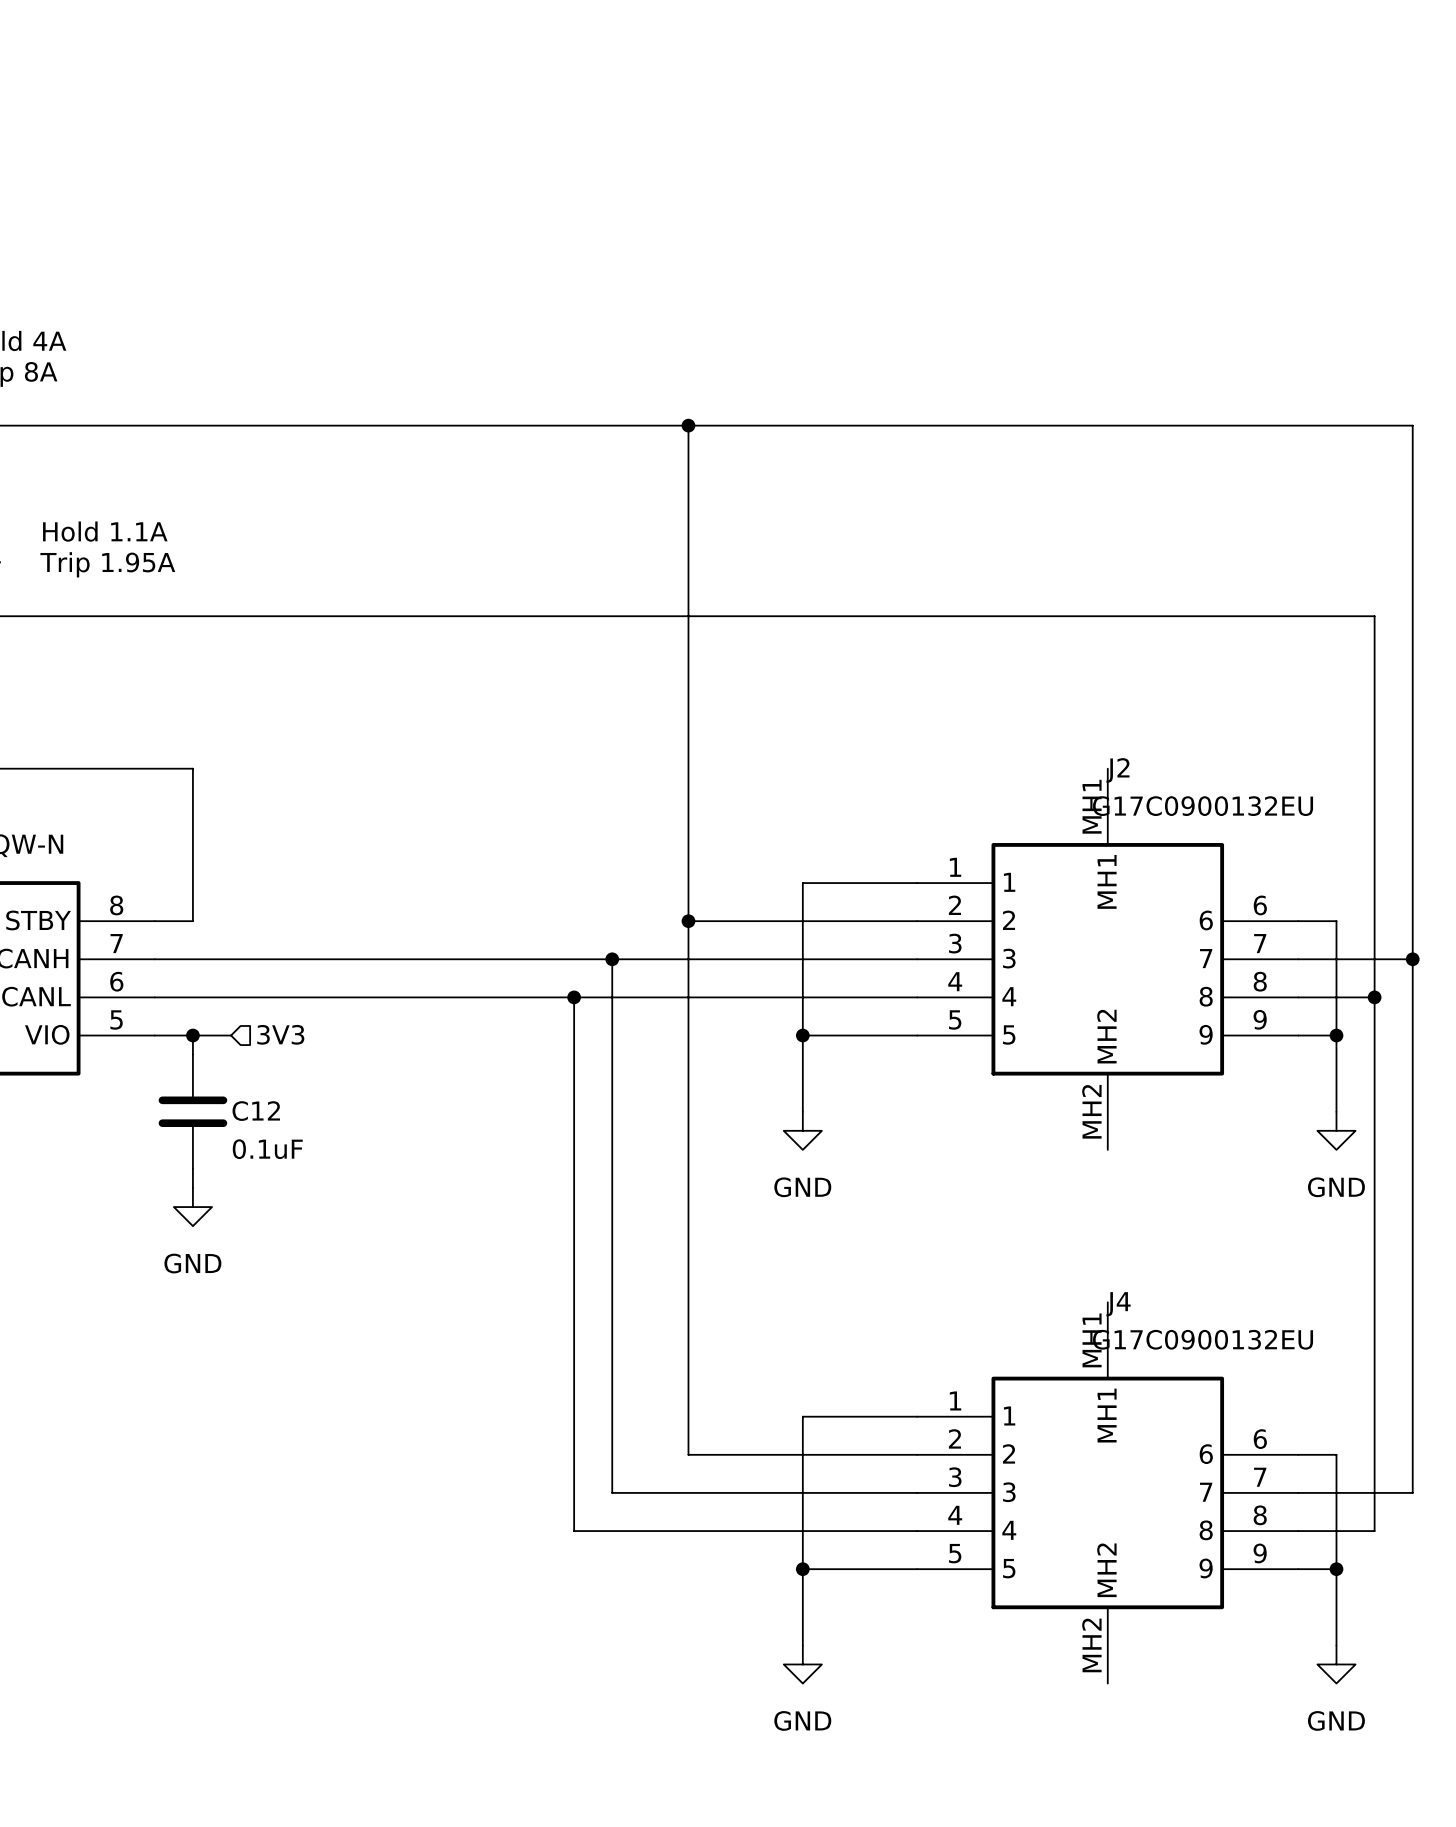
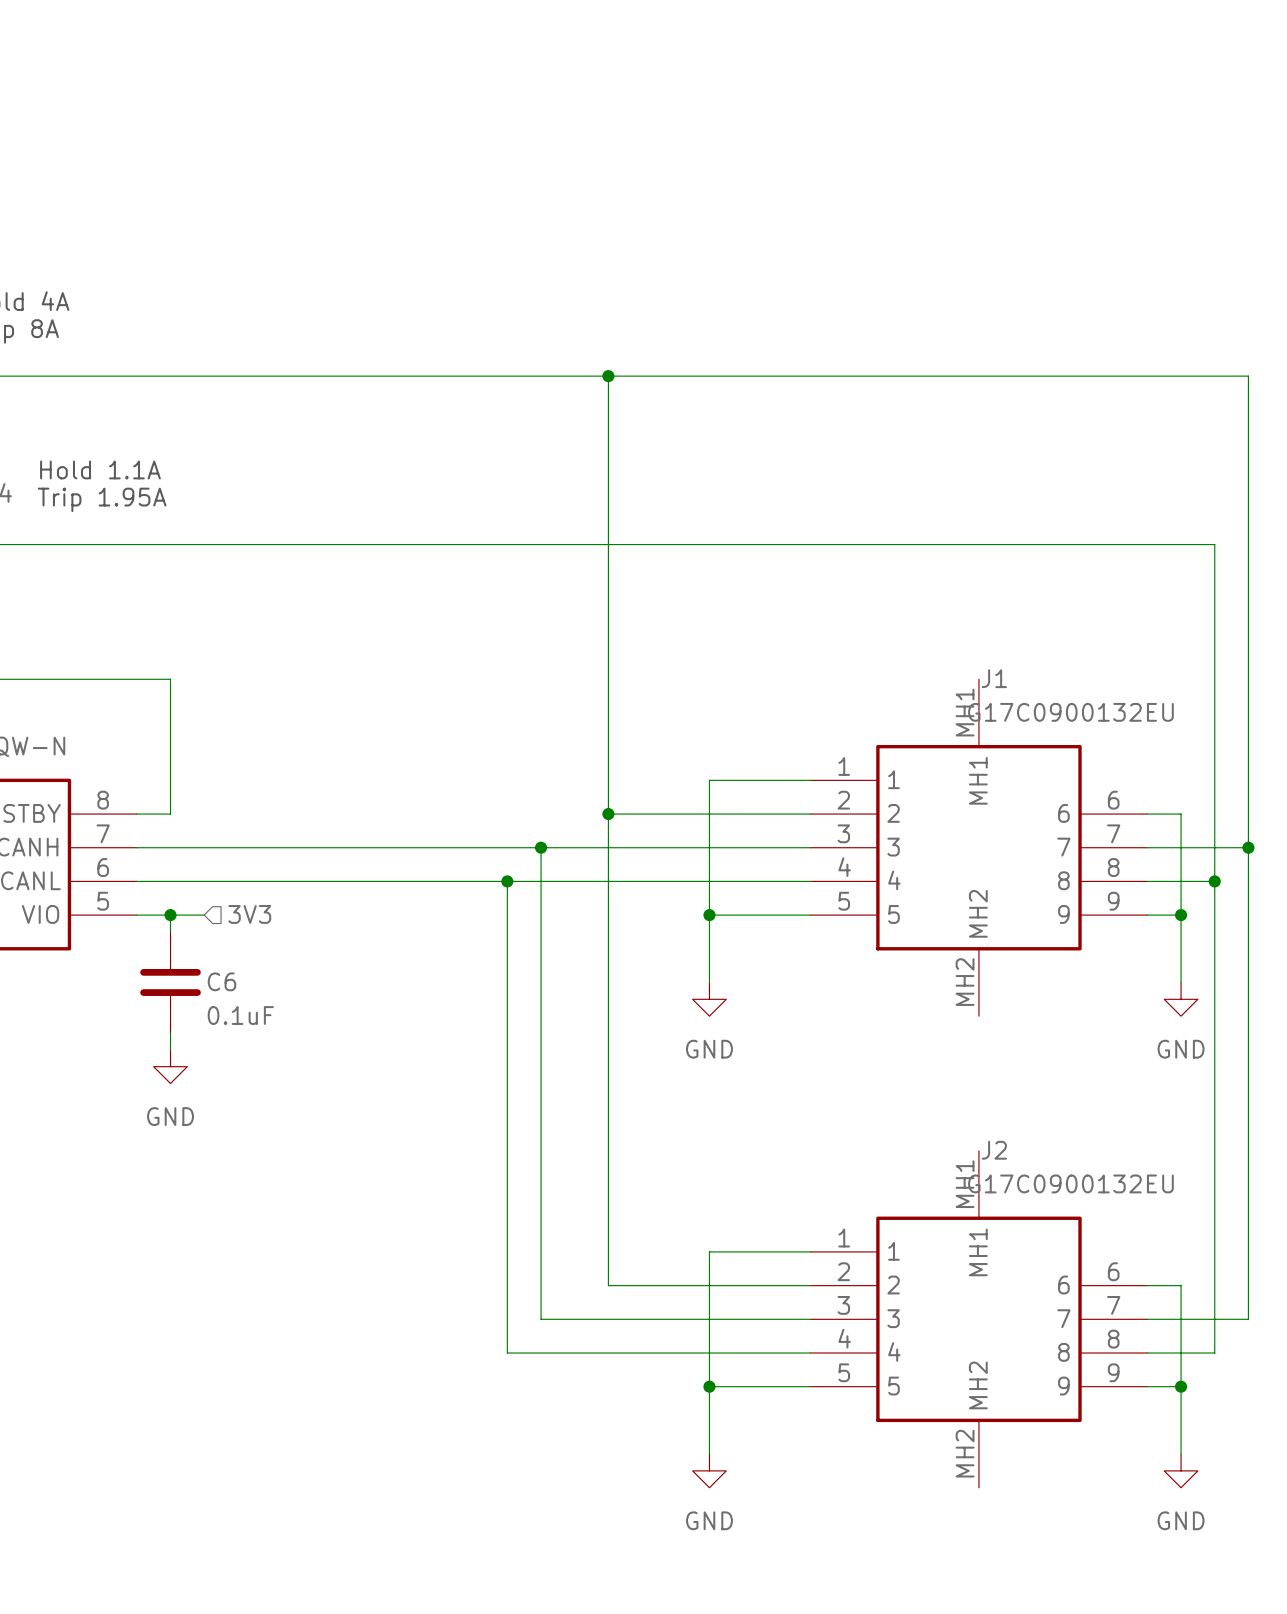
J2 name: J2 (1117, 770) -> J1 (994, 678)
C12 name: C12 (256, 1111) -> C6 (221, 981)
J4 name: J4 (1118, 1304) -> J2 (994, 1150)

